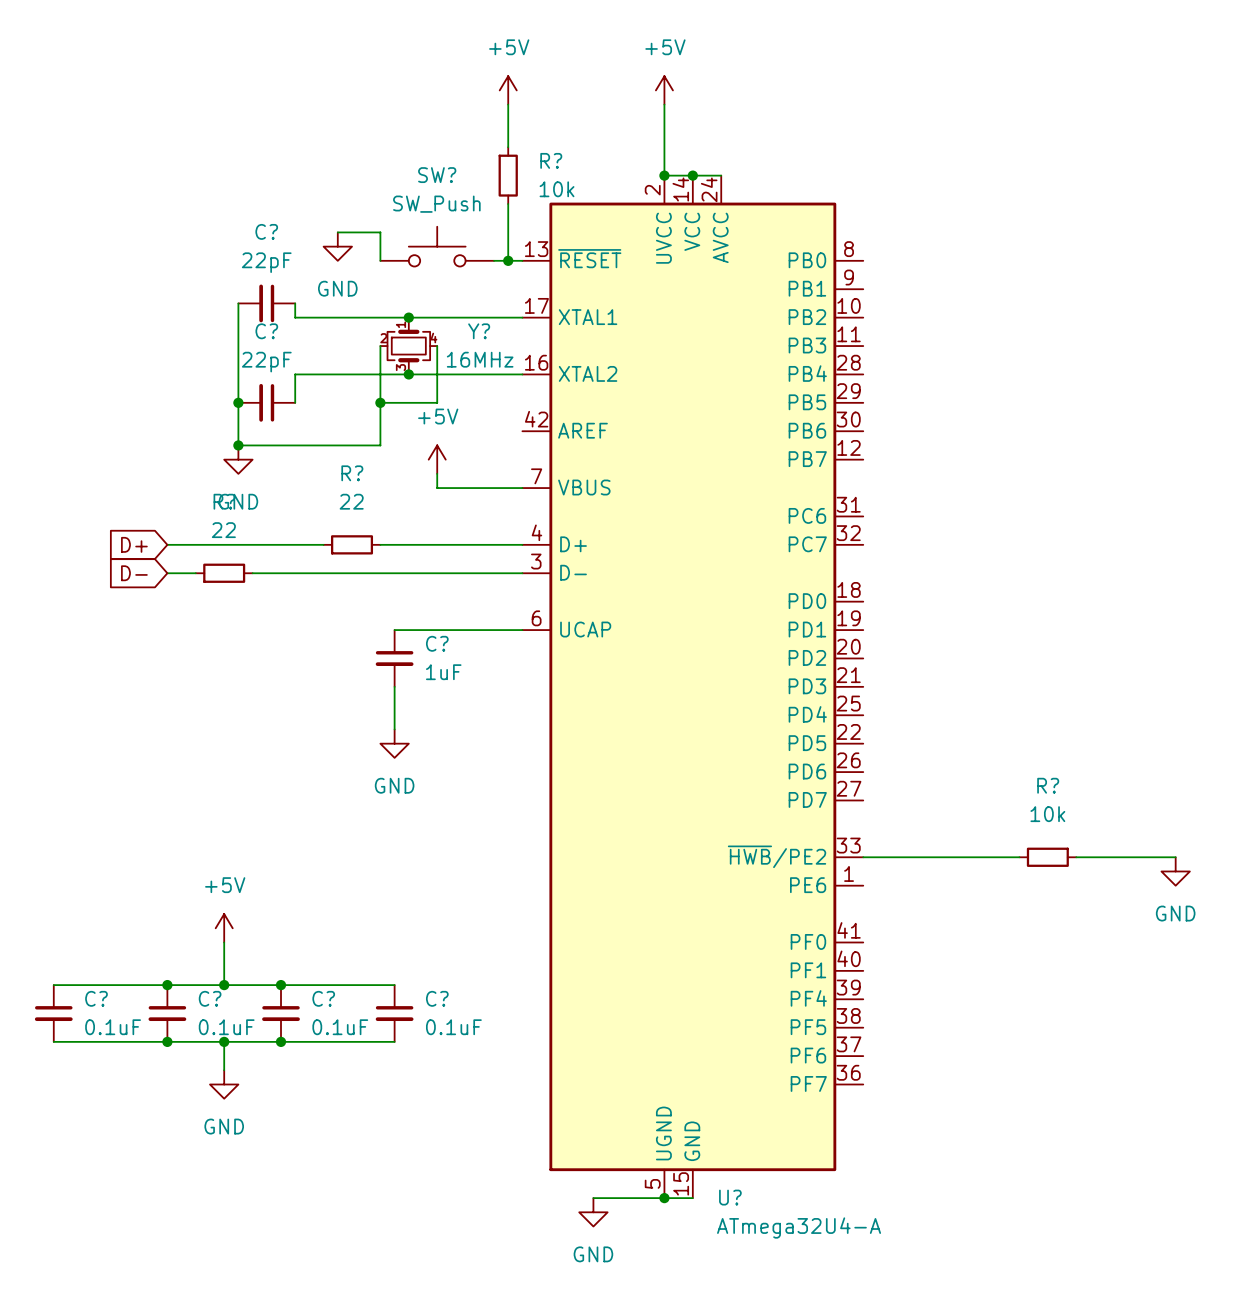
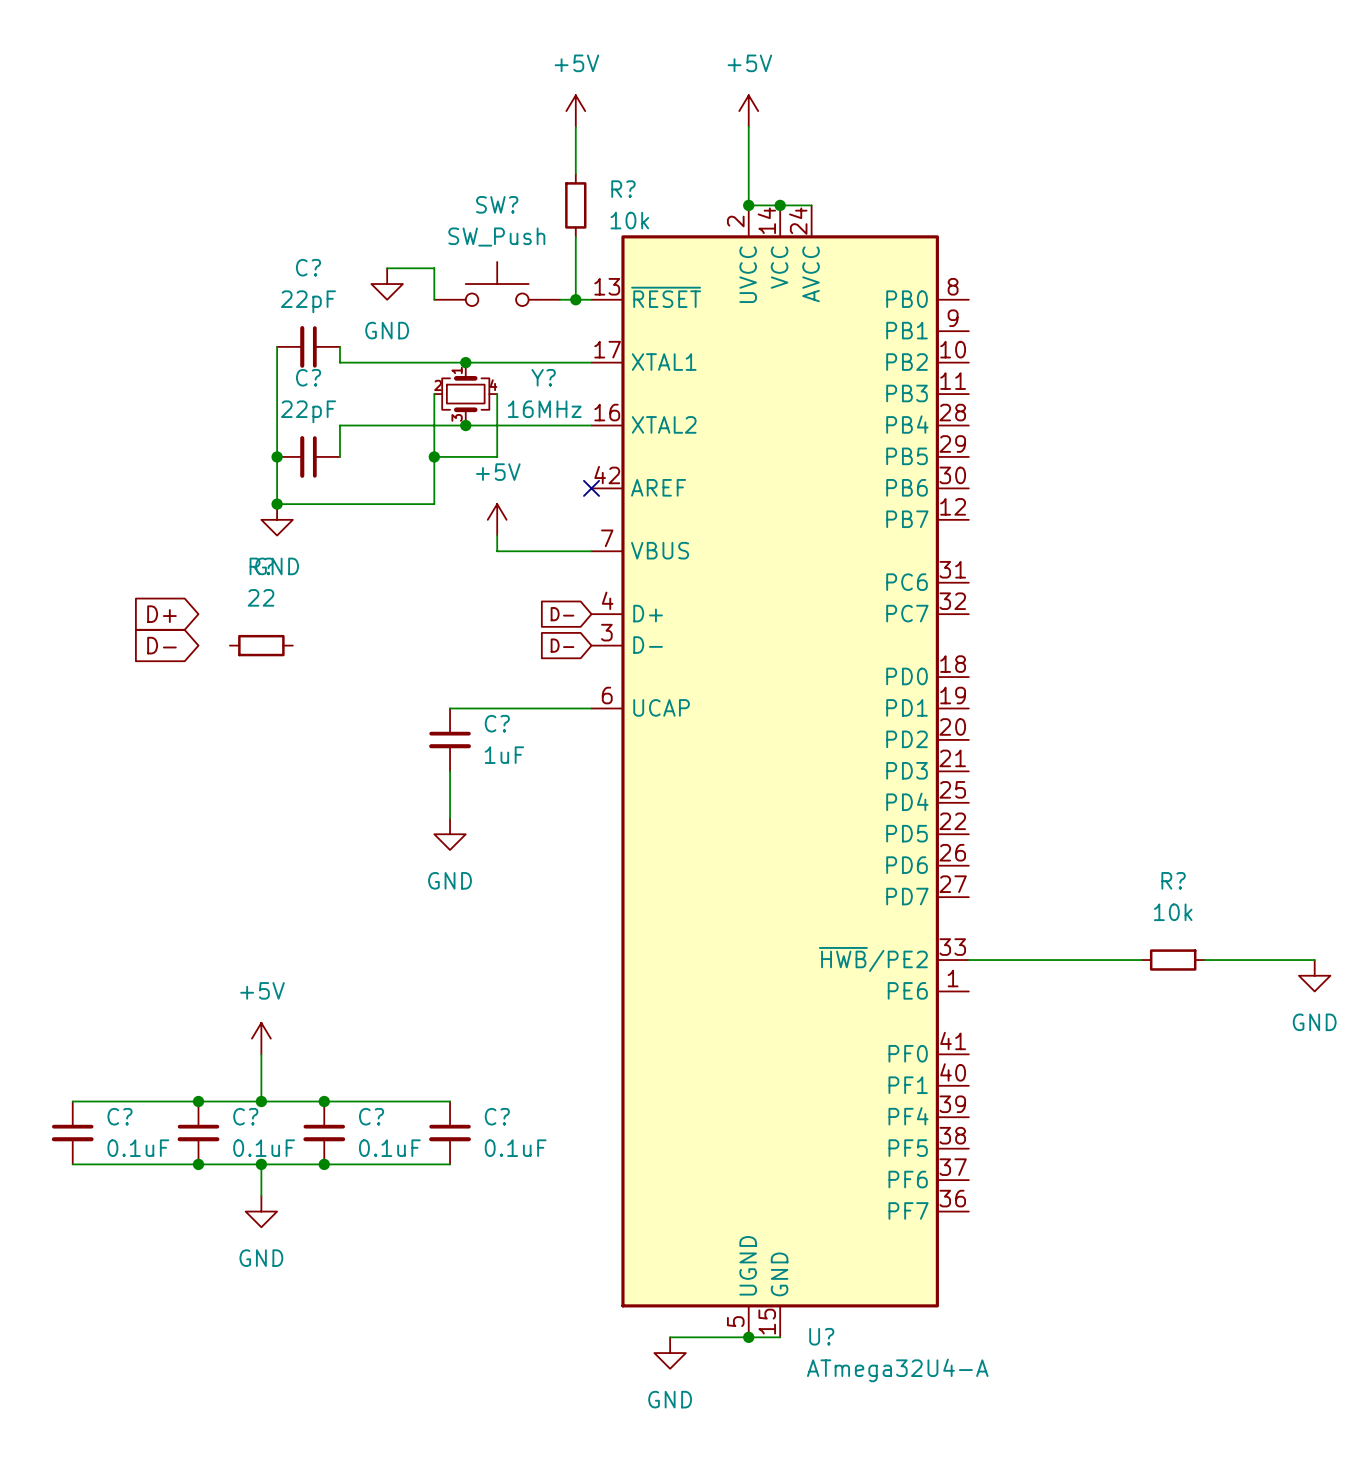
no-connect mark: none -> (591, 488)
wire: (167, 544) (323, 544) -> none
R?: 22 (352, 544) -> none
wire: (380, 544) (522, 544) -> none
global label: none -> D- (562, 614)
wire: (167, 573) (195, 573) -> none
wire: (252, 573) (522, 573) -> none
global label: none -> D- (562, 645)

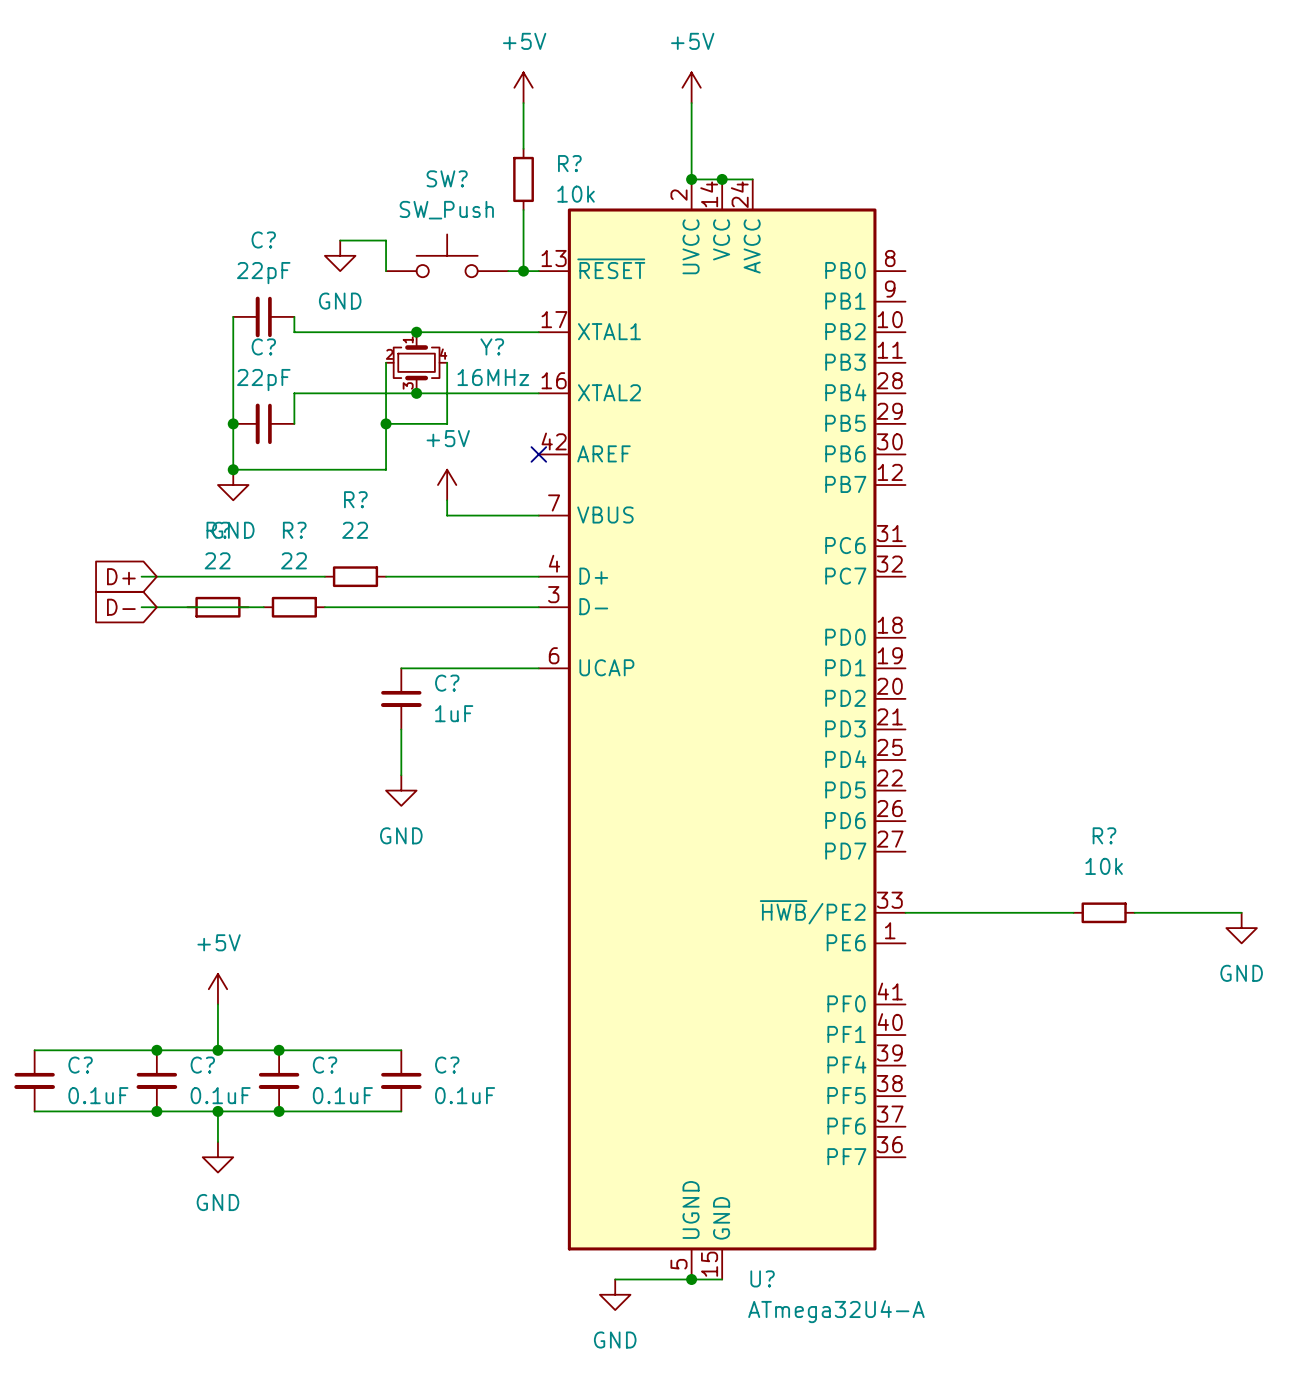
wire: none -> (141, 576) (324, 576)
R?: none -> 22 (355, 576)
wire: none -> (386, 576) (538, 576)
global label: D- (562, 614) -> none
wire: none -> (141, 607) (263, 607)
R?: none -> 22 (294, 607)
wire: none -> (324, 607) (538, 607)
global label: D- (562, 645) -> none

